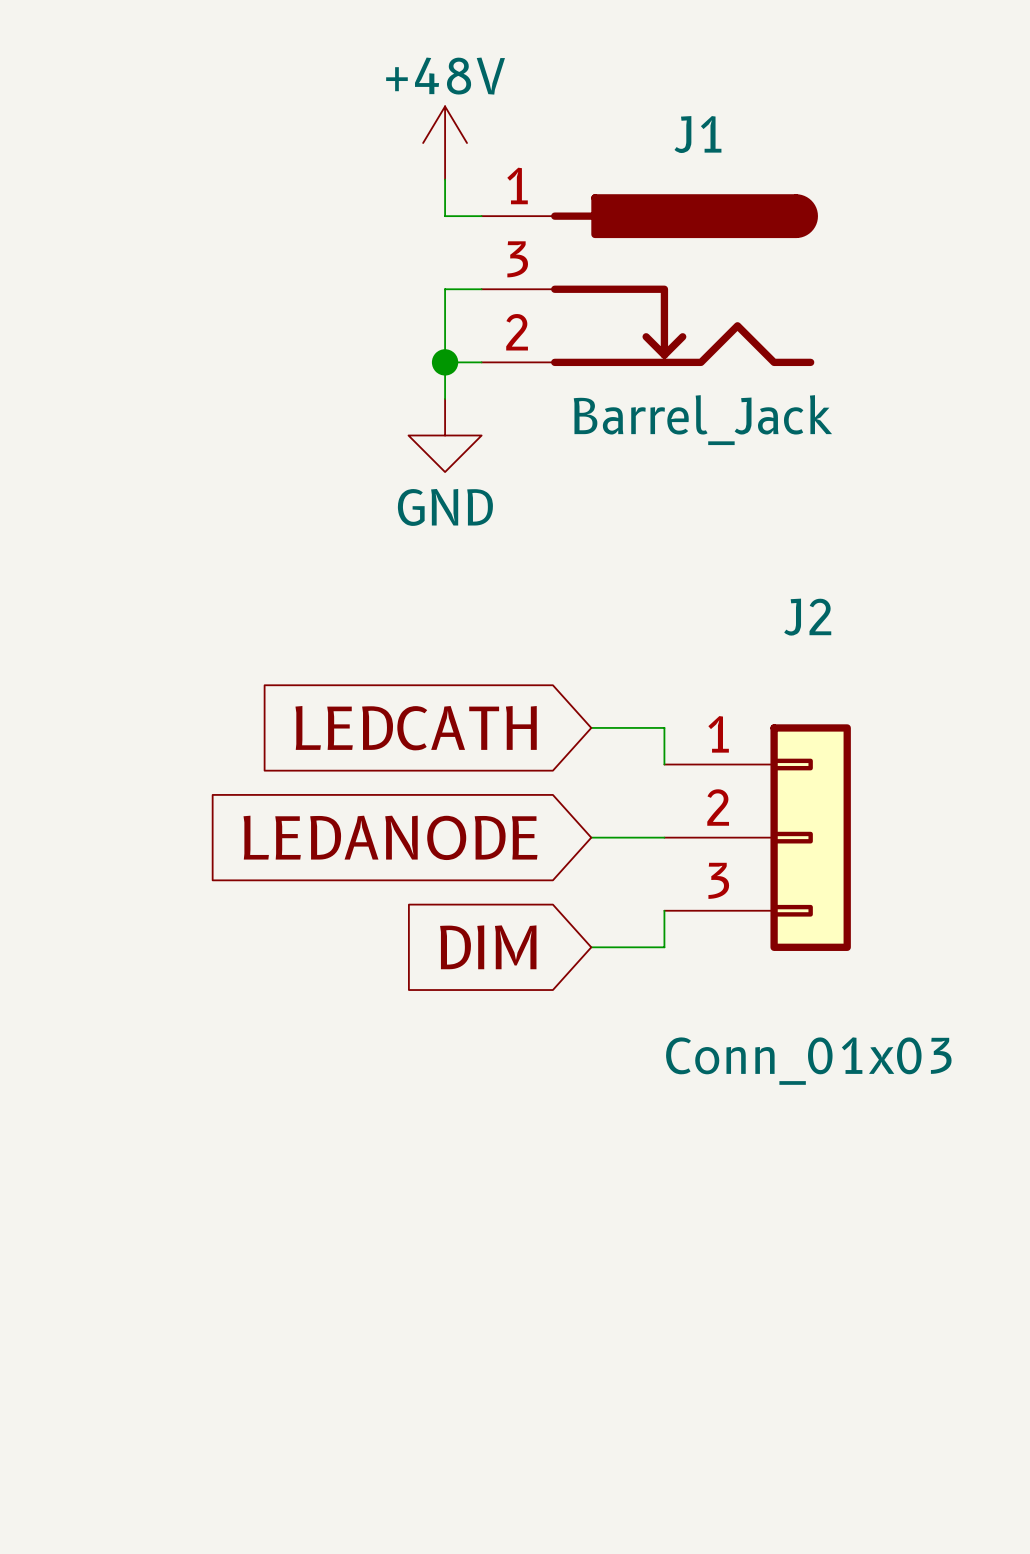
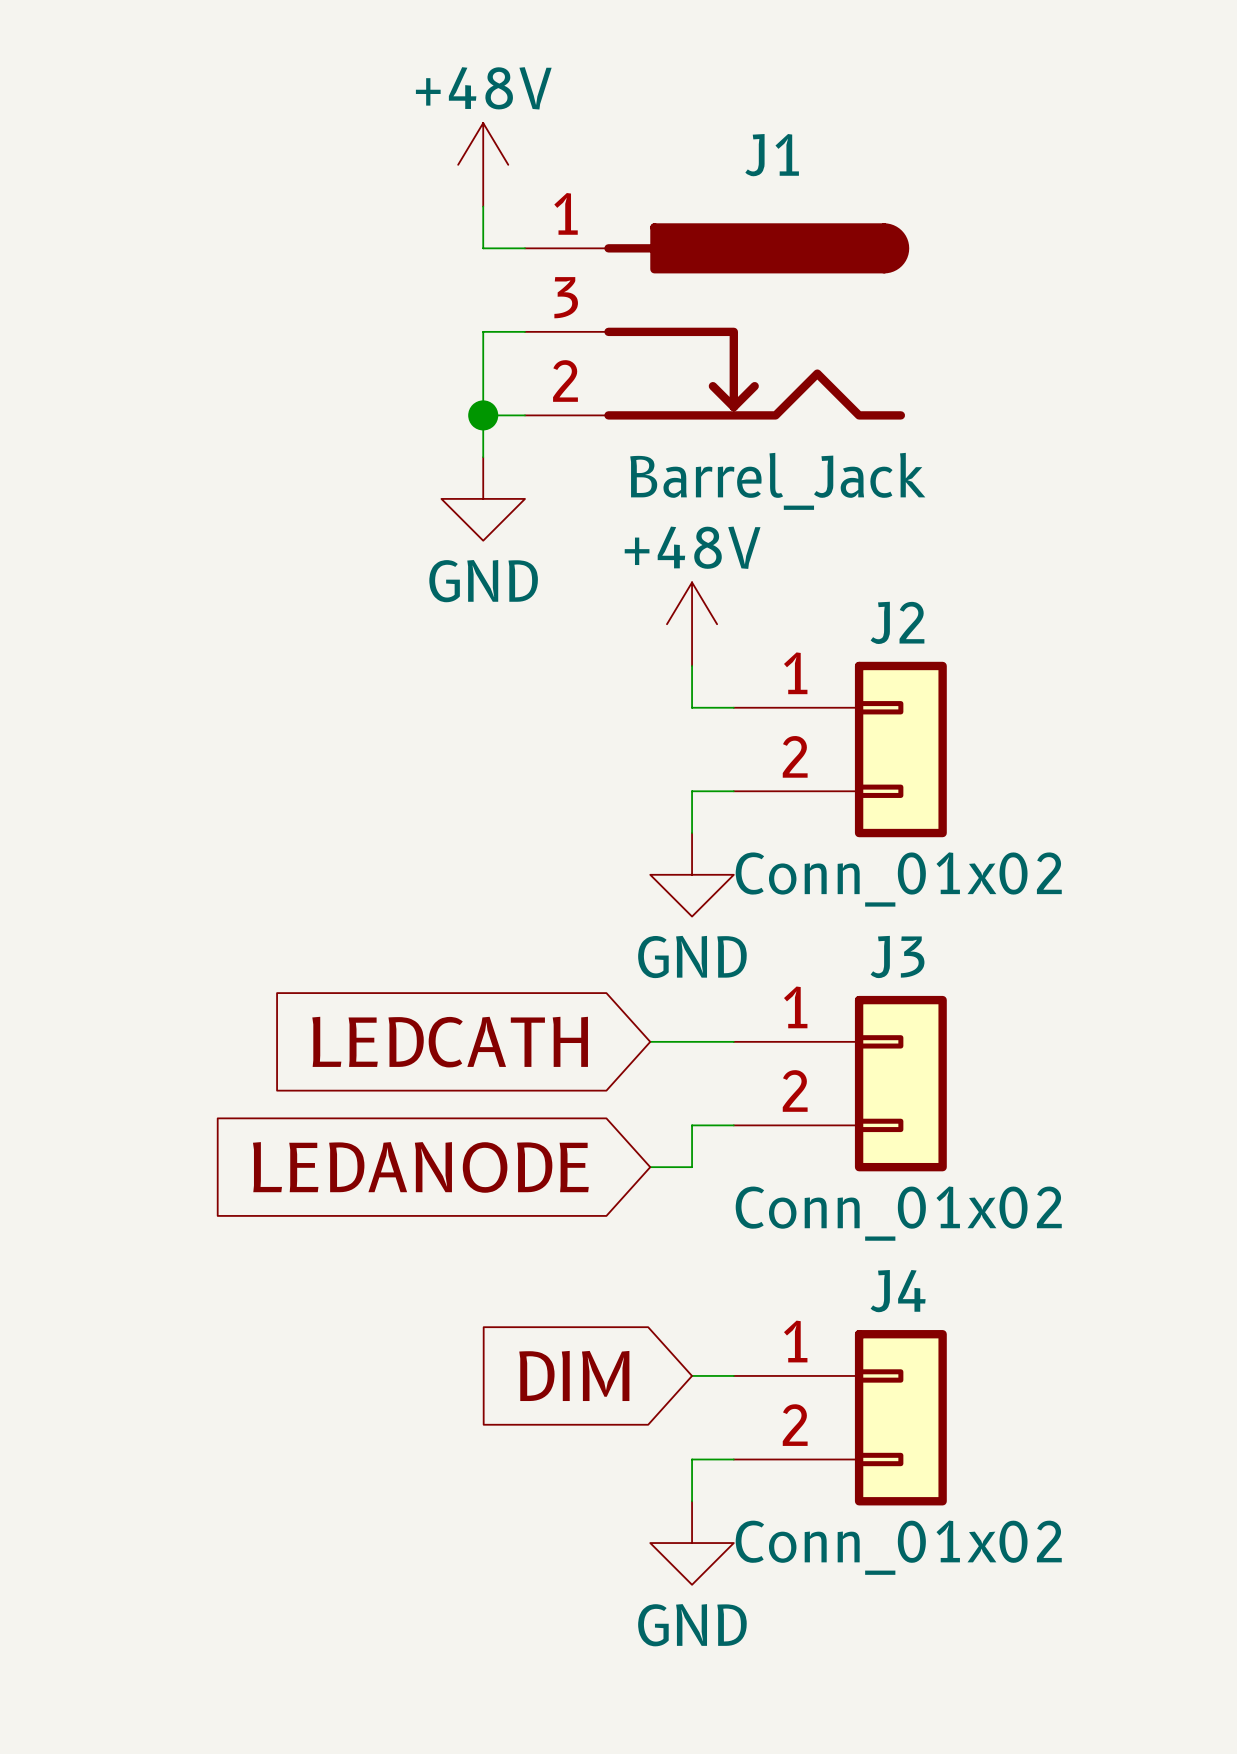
power symbol: none -> +48V (692, 624)
wire: none -> (692, 665) (692, 707) (733, 707)
J2 name position: J2 (807, 617) -> J2 (897, 622)
wire: none -> (733, 791) (692, 791) (692, 833)
J2 symbol: [664, 724, 851, 951] -> [733, 661, 947, 838]
wire: (591, 727) (664, 727) (664, 764) -> none
global label position: LEDCATH (416, 728) -> LEDCATH (450, 1042)
power symbol: none -> GND (692, 874)
global label position: LEDANODE (390, 837) -> LEDANODE (420, 1167)
wire: (591, 837) (664, 837) -> none
wire: (664, 910) (664, 947) (591, 947) -> (733, 1041) (650, 1041)
global label position: DIM (488, 947) -> DIM (574, 1375)
J3: none -> Conn_01x02 (840, 1083)
wire: none -> (733, 1125) (692, 1125) (692, 1167) (650, 1167)
J2 value: Conn_01x03 (808, 1061) -> Conn_01x02 (898, 879)
wire: none -> (692, 1375) (733, 1375)
J4: none -> Conn_01x02 (840, 1417)
wire: none -> (733, 1459) (692, 1459) (692, 1501)
power symbol: none -> GND (692, 1543)

